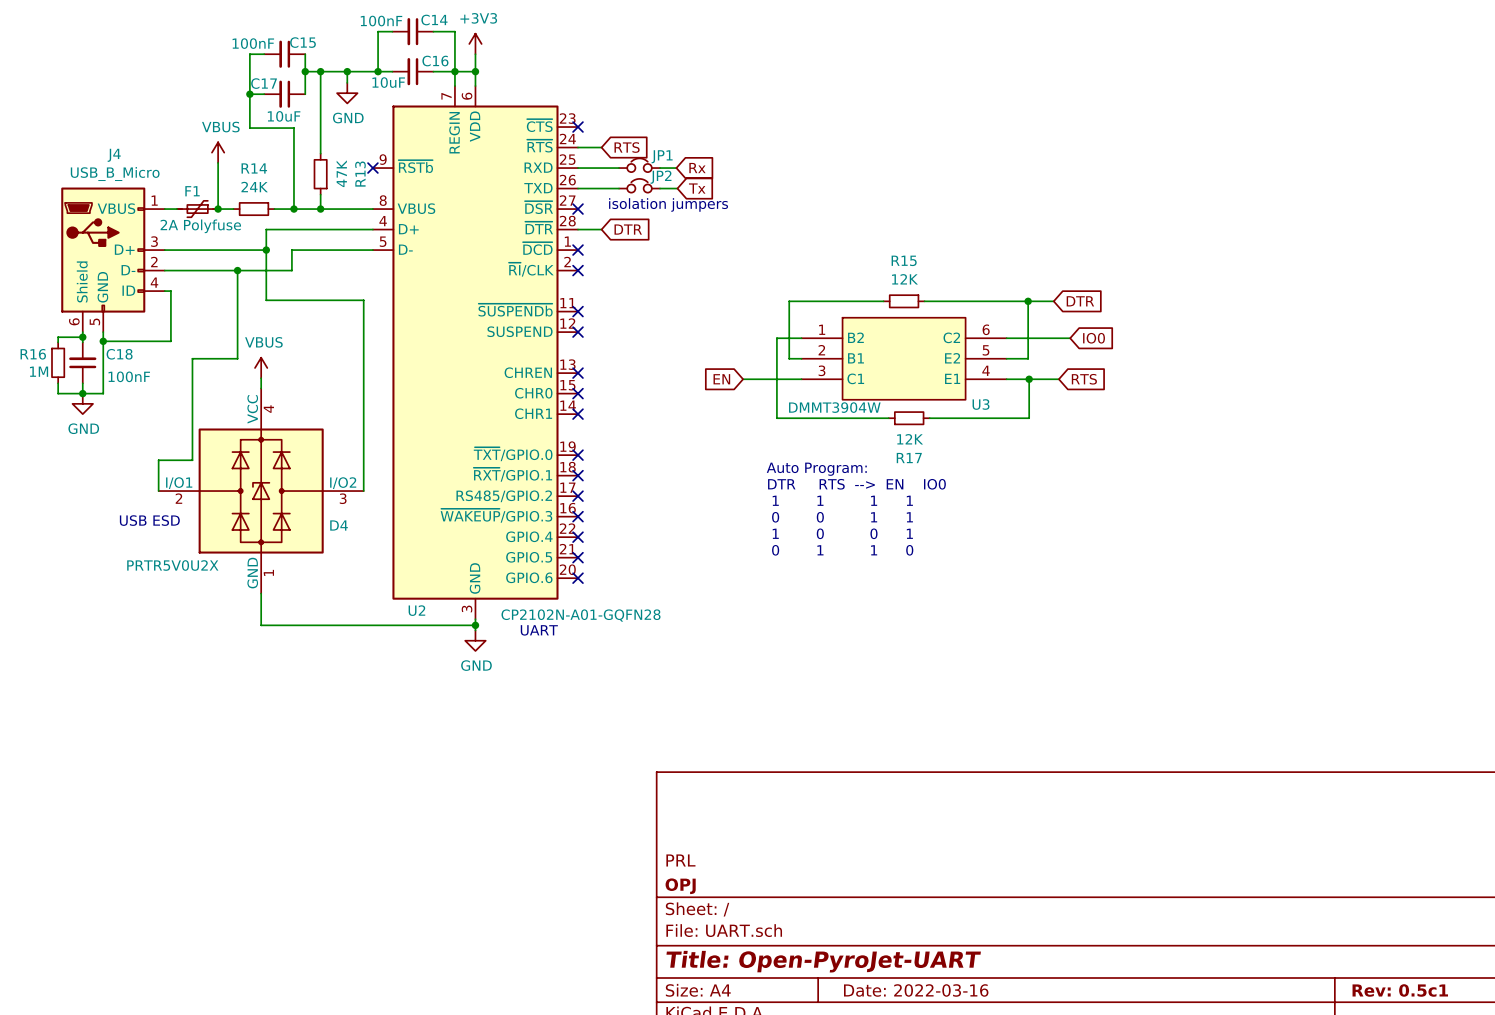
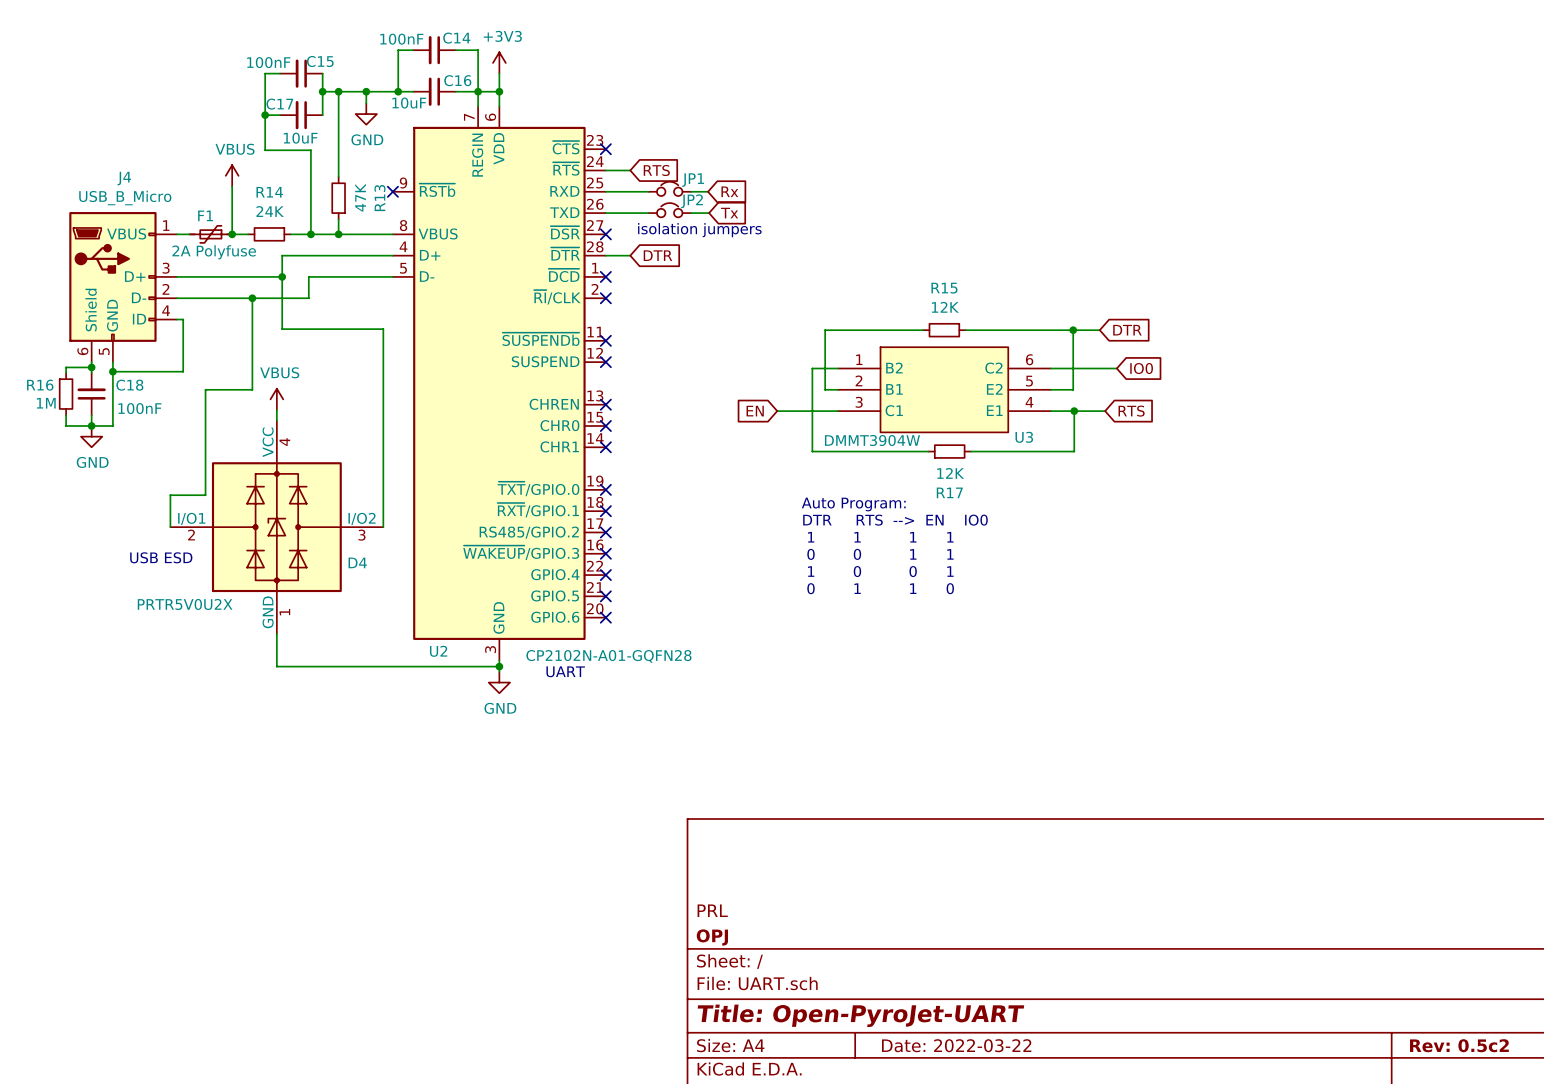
title block: Date: 2022-03-16 (916, 990) -> Date: 2022-03-22 (956, 1045)
title block: Rev: 0.5c1 (1400, 990) -> Rev: 0.5c2 (1459, 1045)

